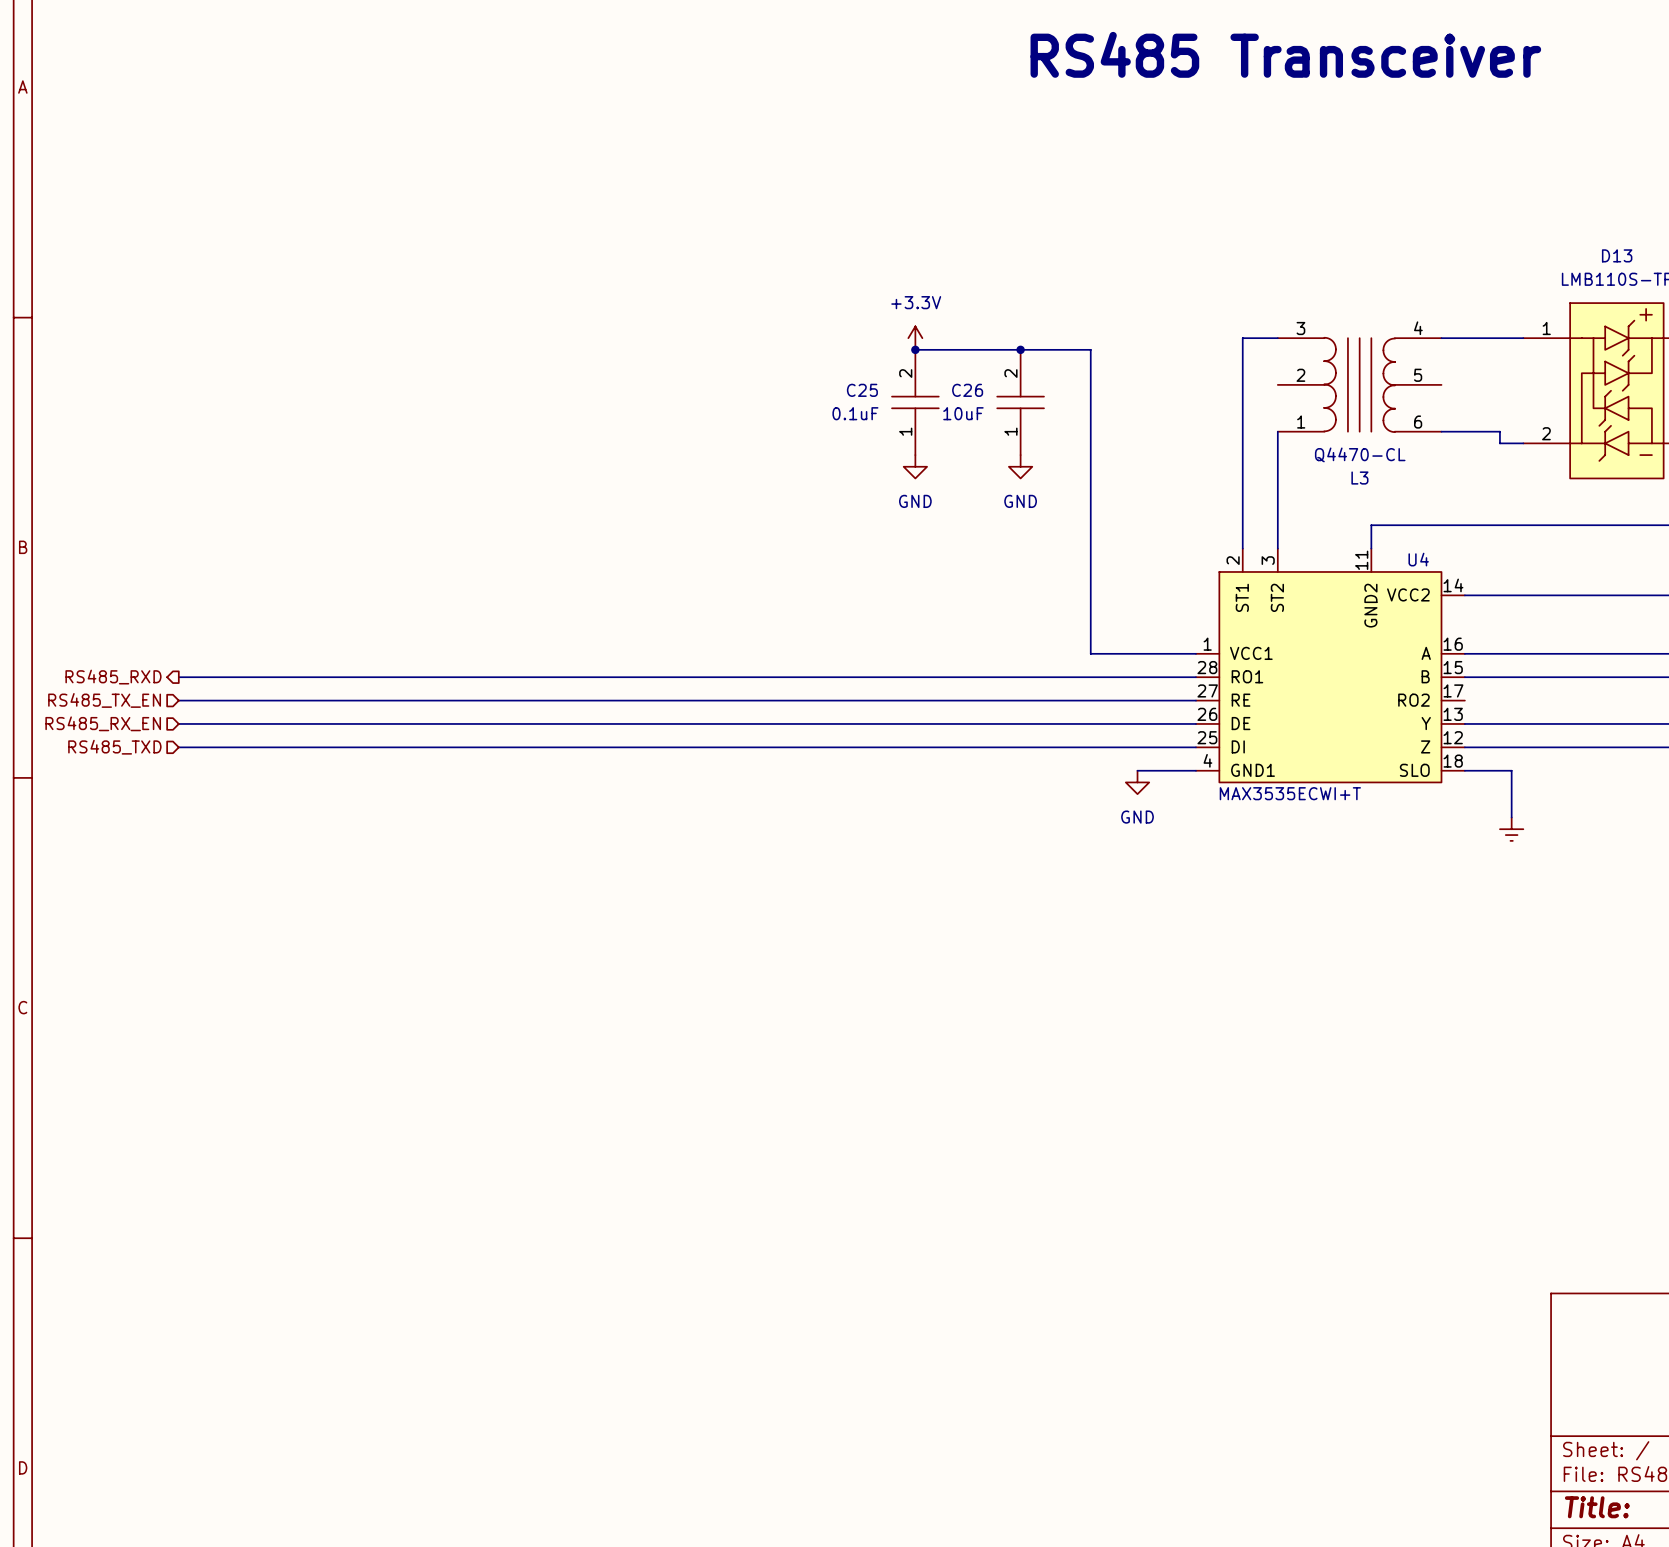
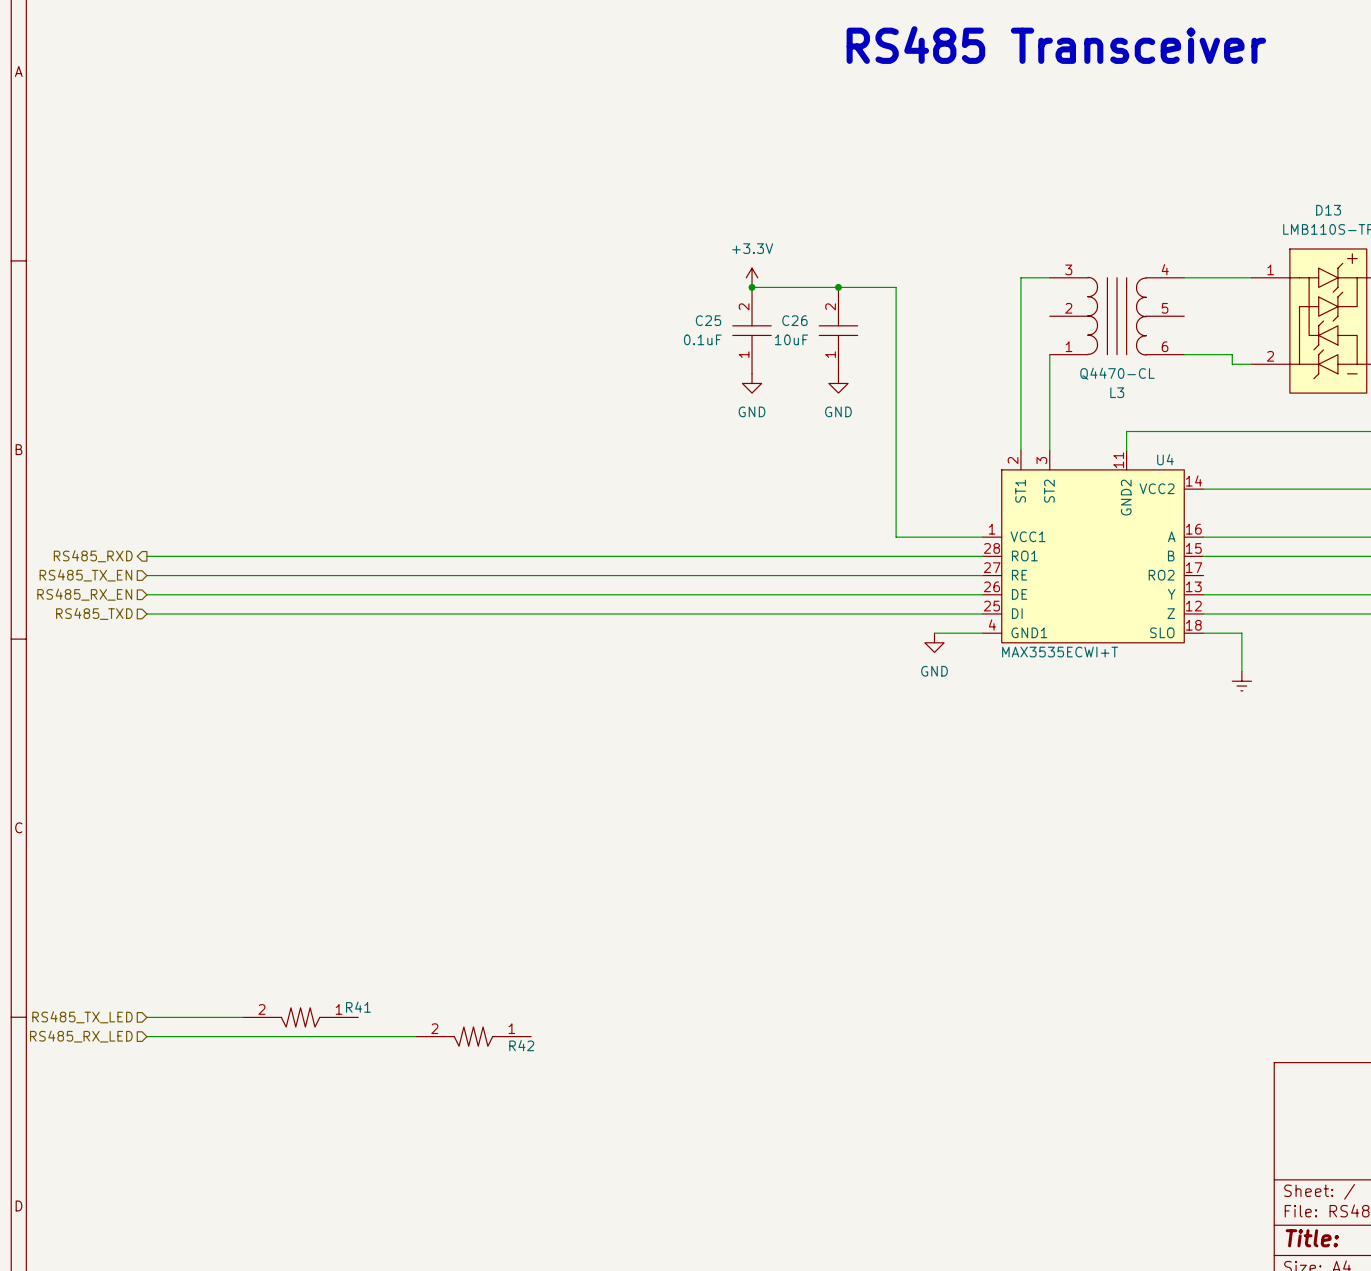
hierarchical label: none -> RS485_TX_LED (82, 1017)
wire: none -> (146, 1017) (242, 1017)
R41: none -> (300, 1017)
hierarchical label: none -> RS485_RX_LED (81, 1036)
wire: none -> (146, 1036) (415, 1036)
R42: none -> (473, 1036)

